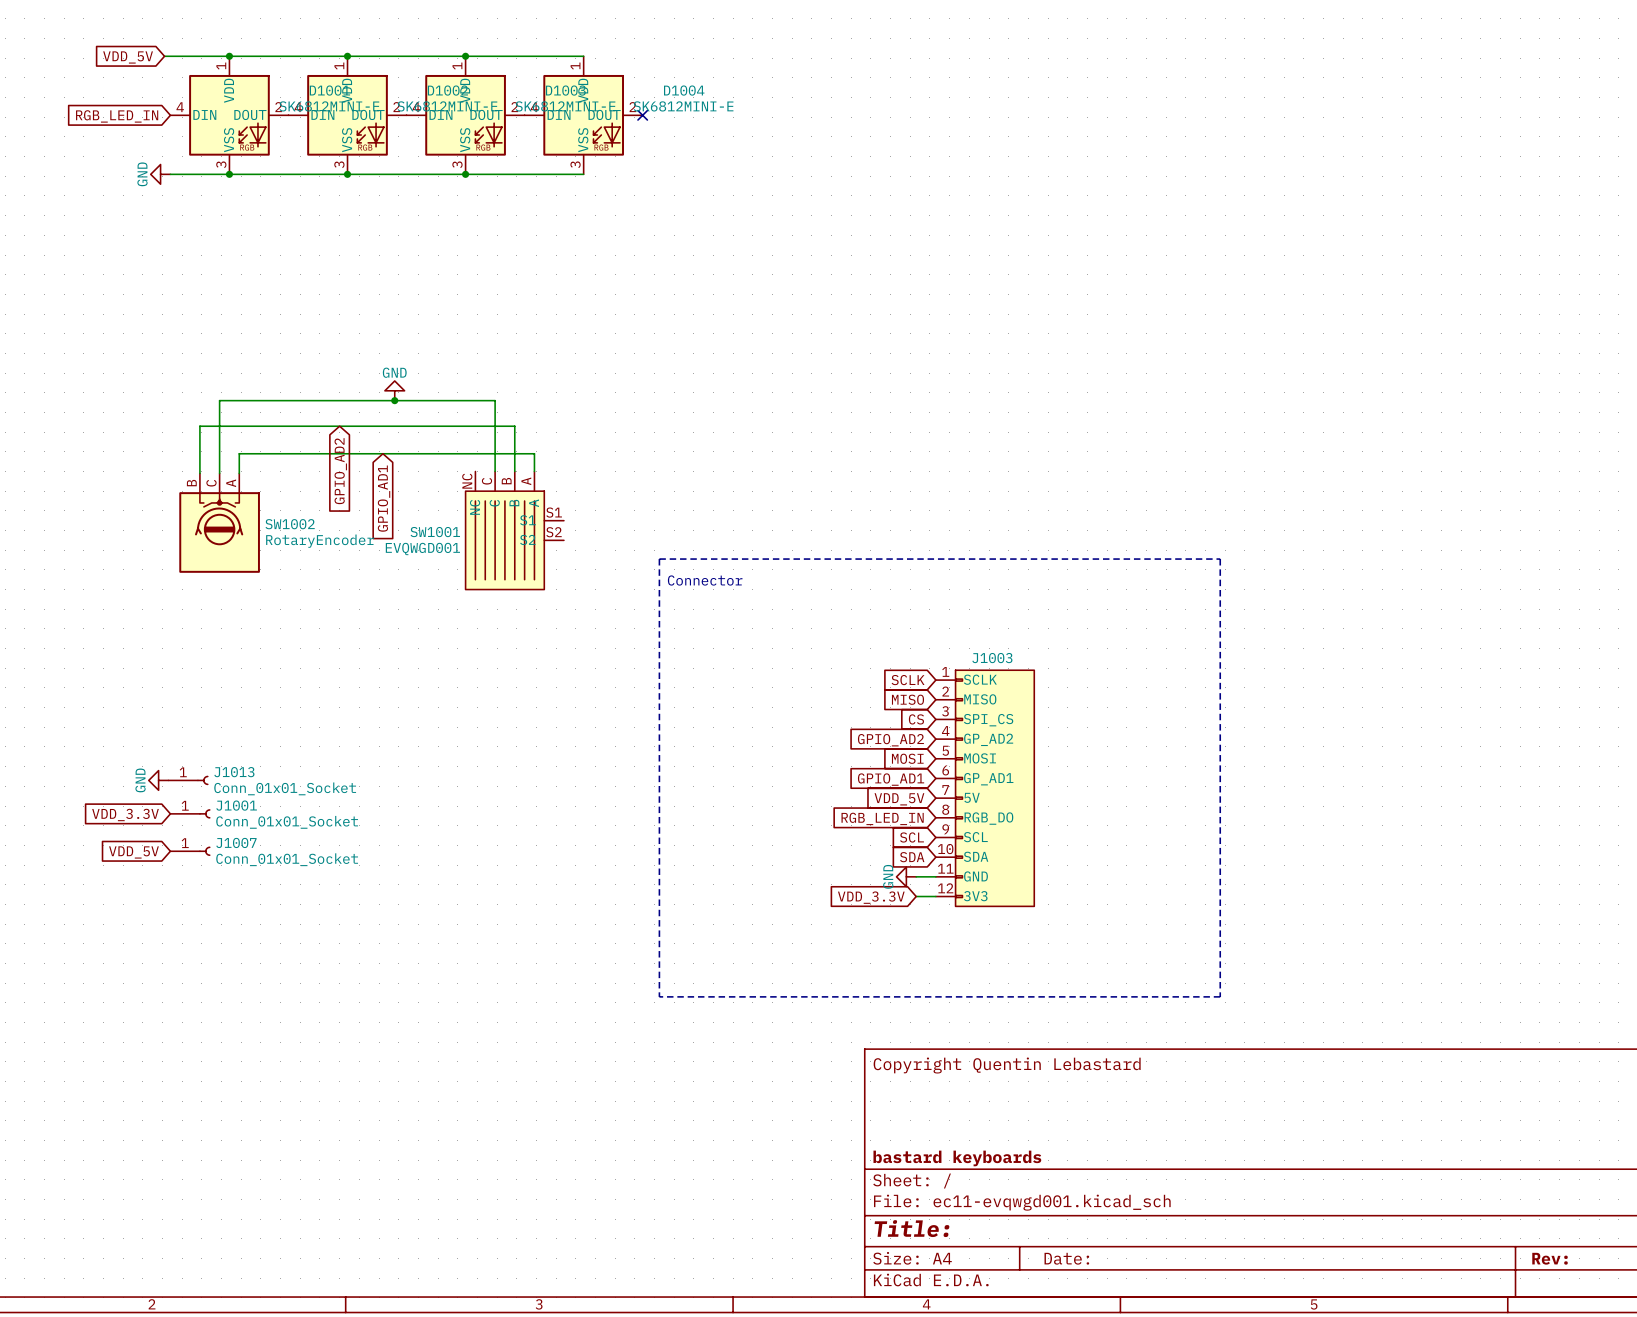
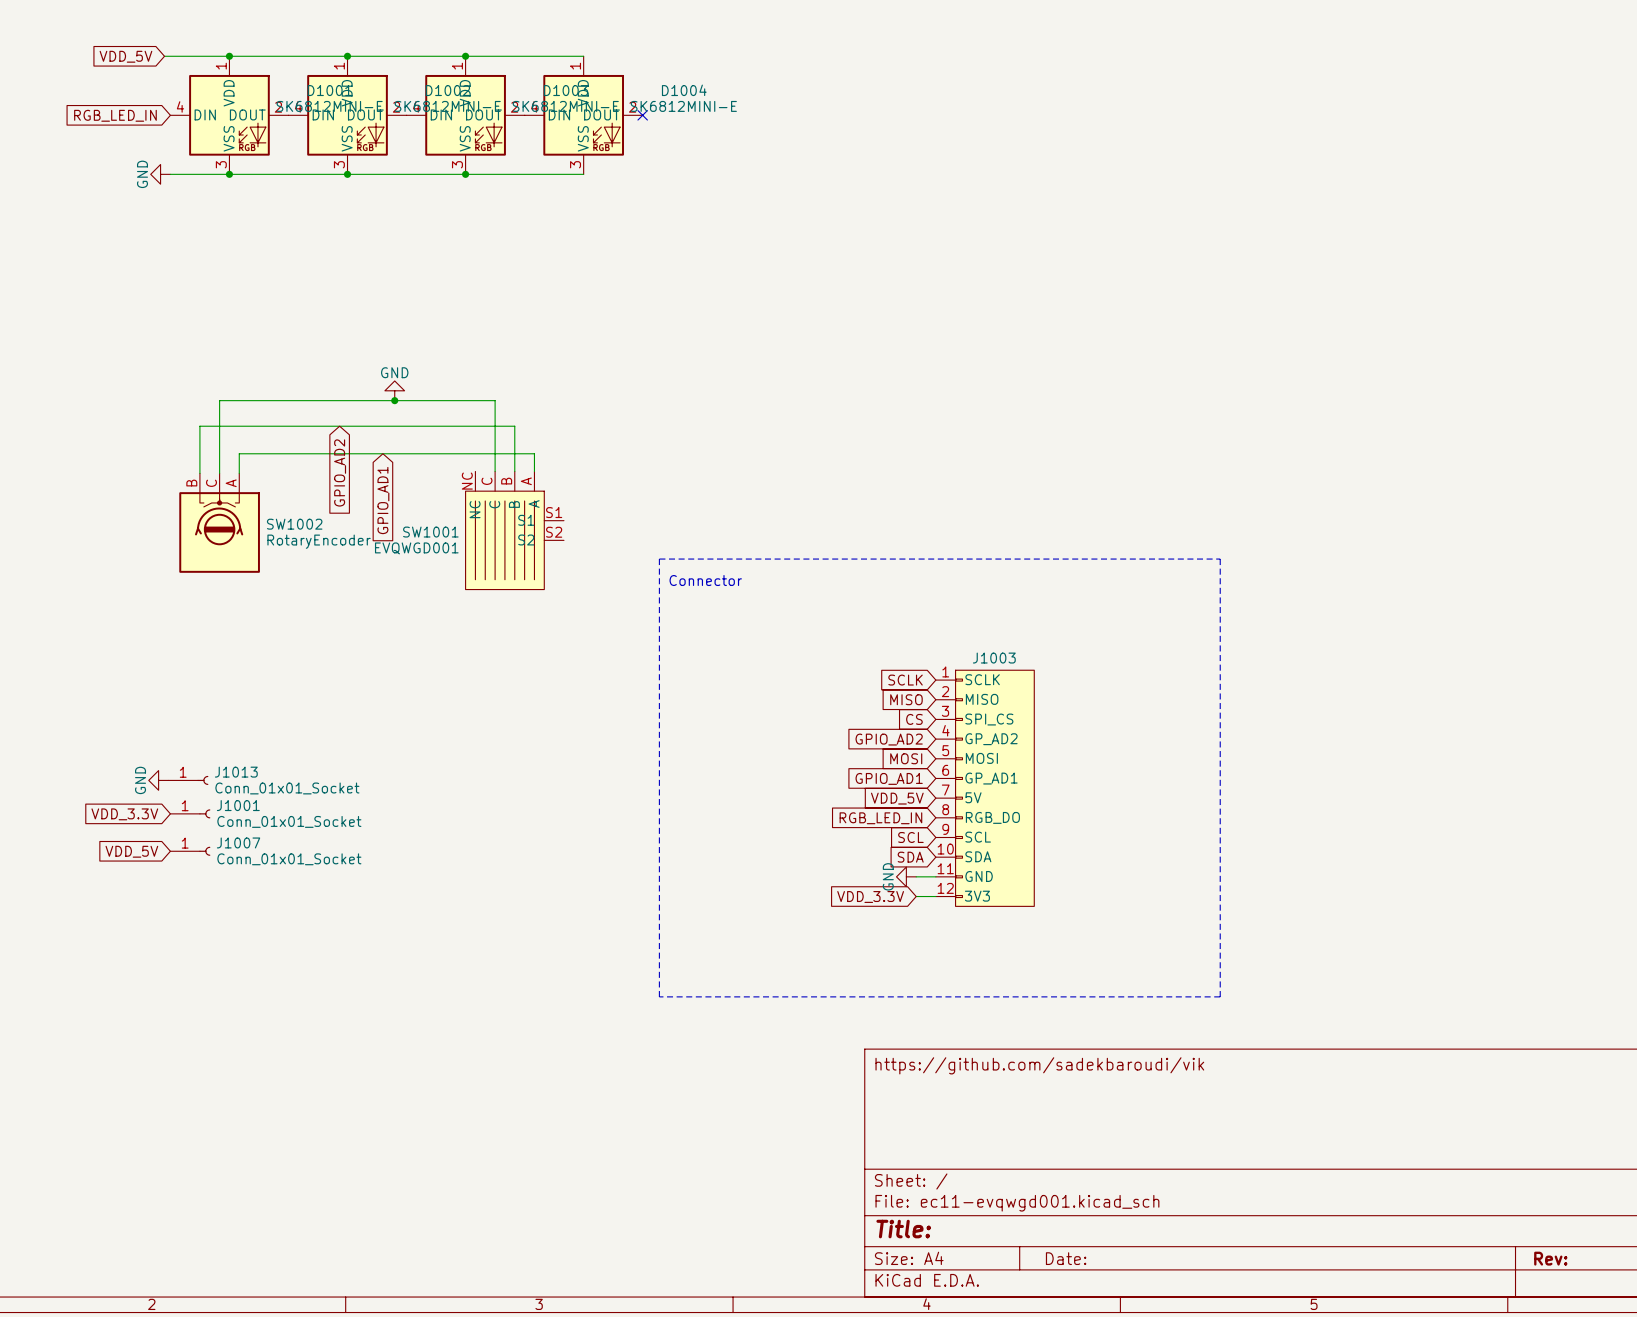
title block: Copyright Quentin Lebastard (1007, 1065) -> https://github.com/sadekbaroudi/vik (1039, 1065)
title block: bastard keyboards (957, 1158) -> none

